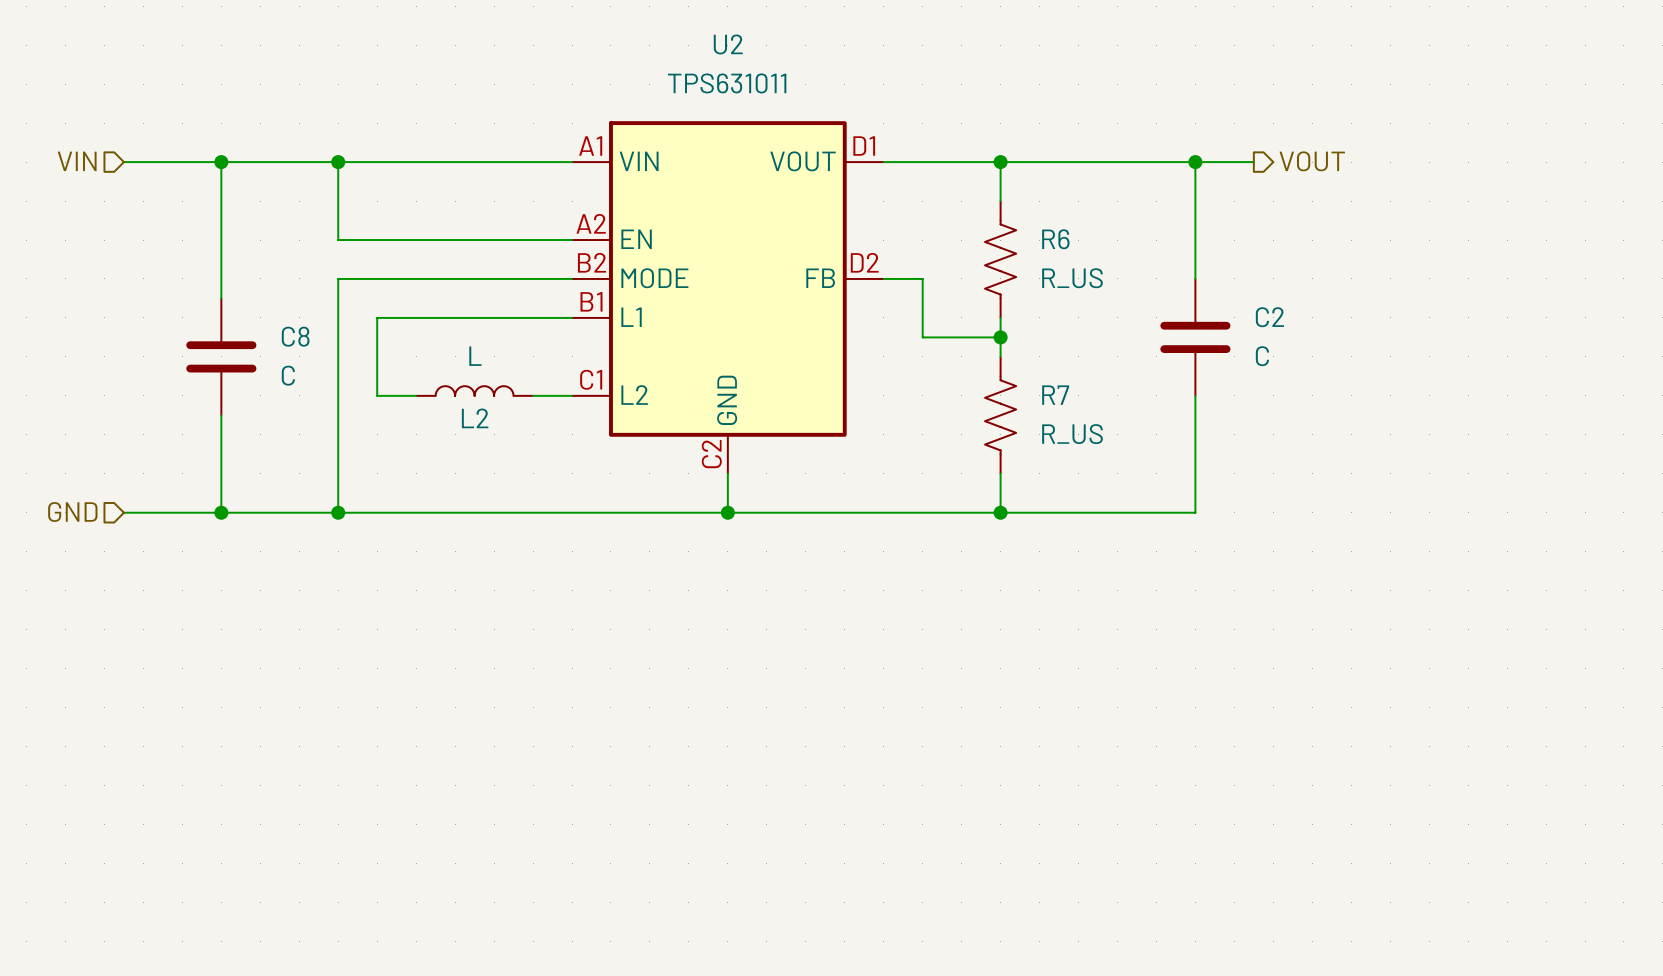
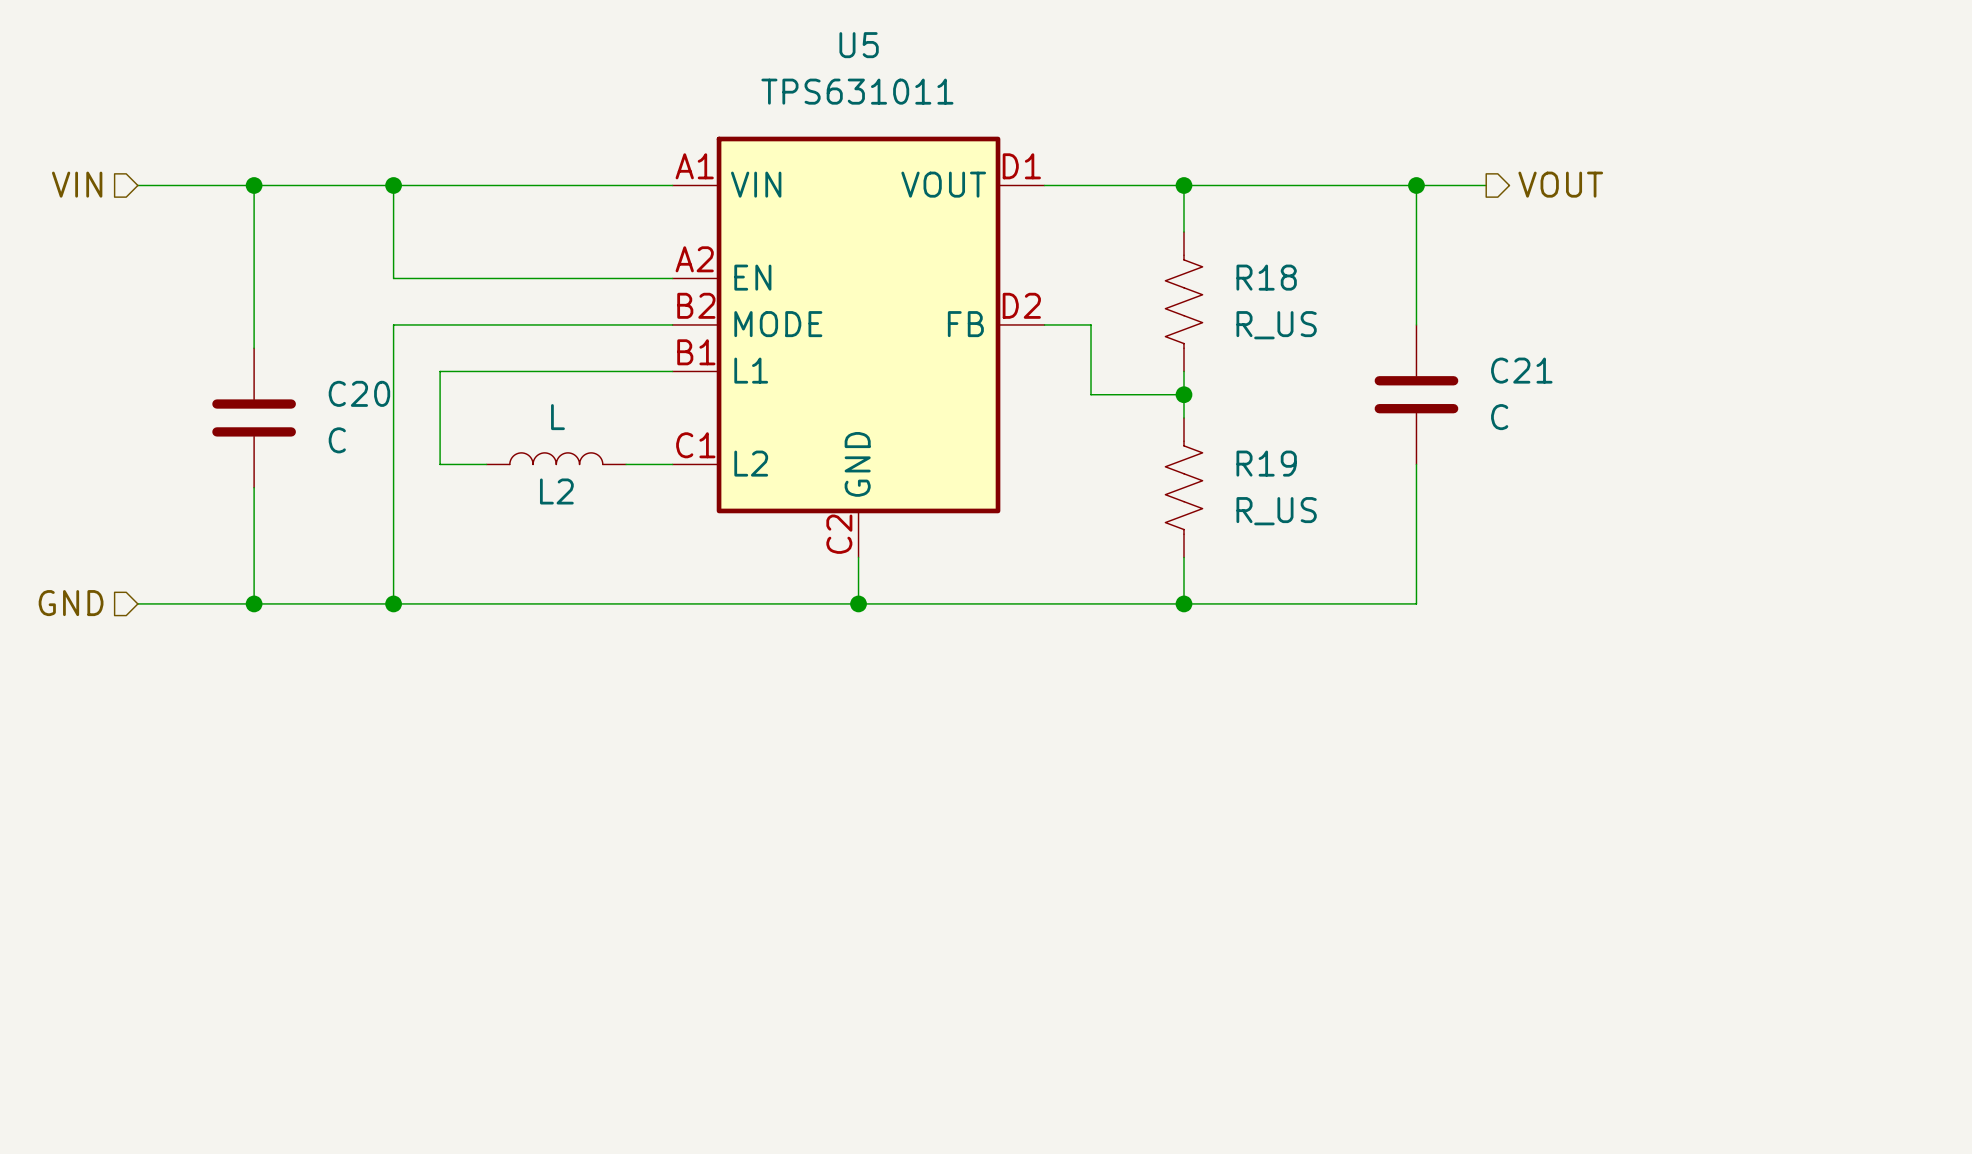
U2 name: U2 (728, 44) -> U5 (859, 45)
R6 name: R6 (1055, 239) -> R18 (1266, 277)
C2 name: C2 (1269, 317) -> C21 (1521, 370)
C8 name: C8 (295, 336) -> C20 (359, 393)
R7 name: R7 (1055, 395) -> R19 (1266, 463)

